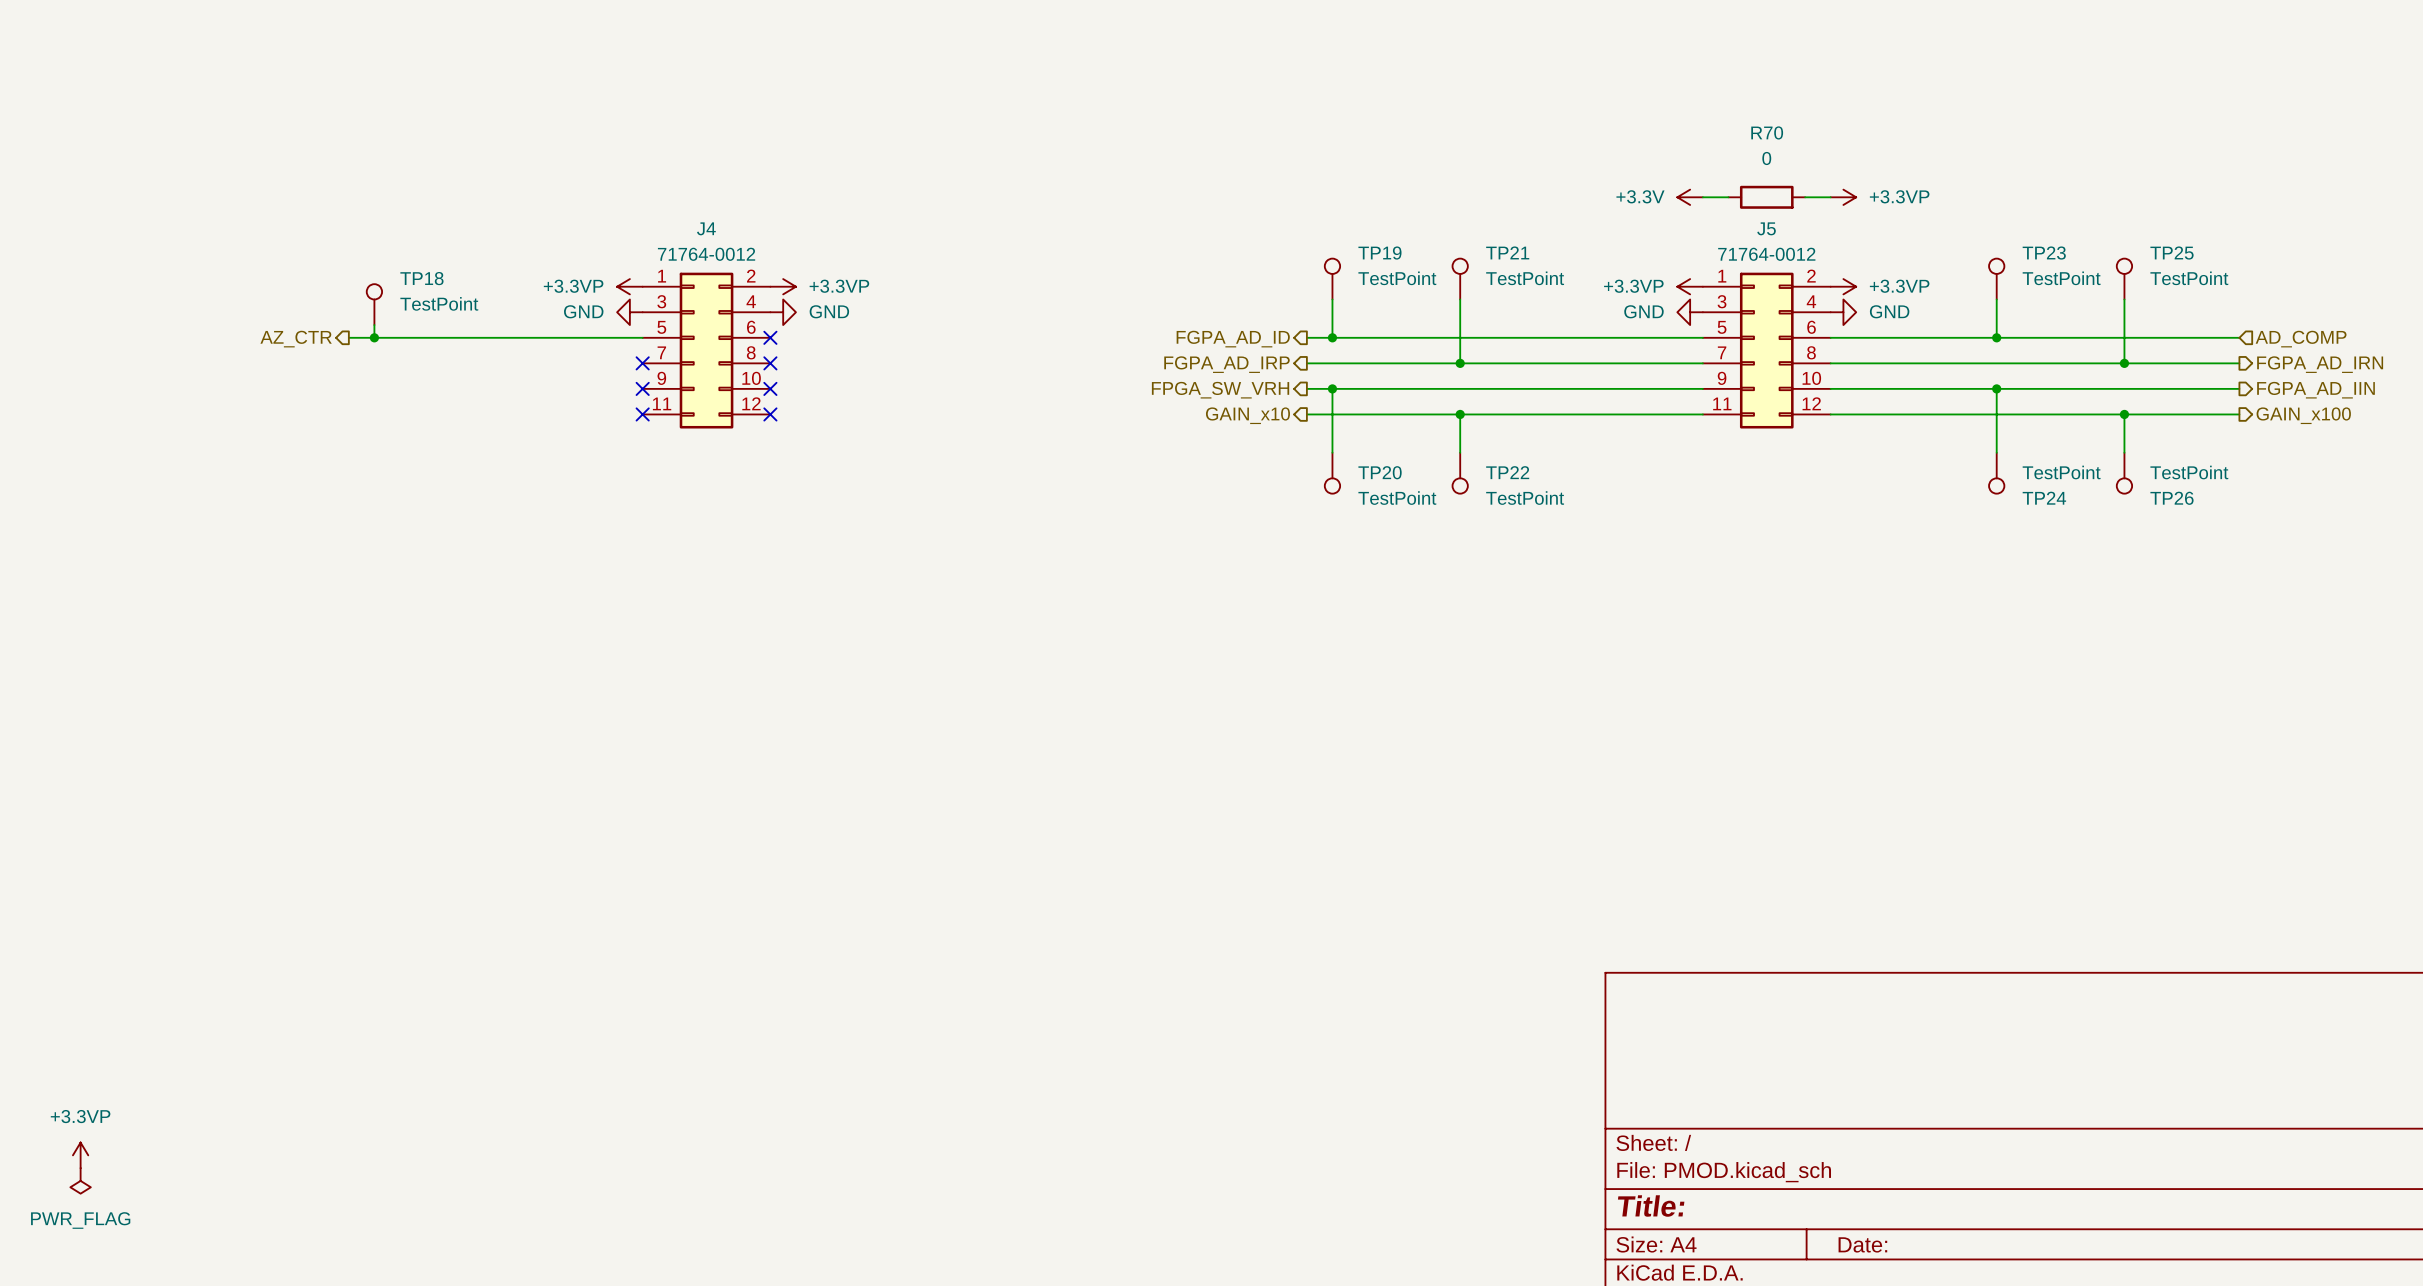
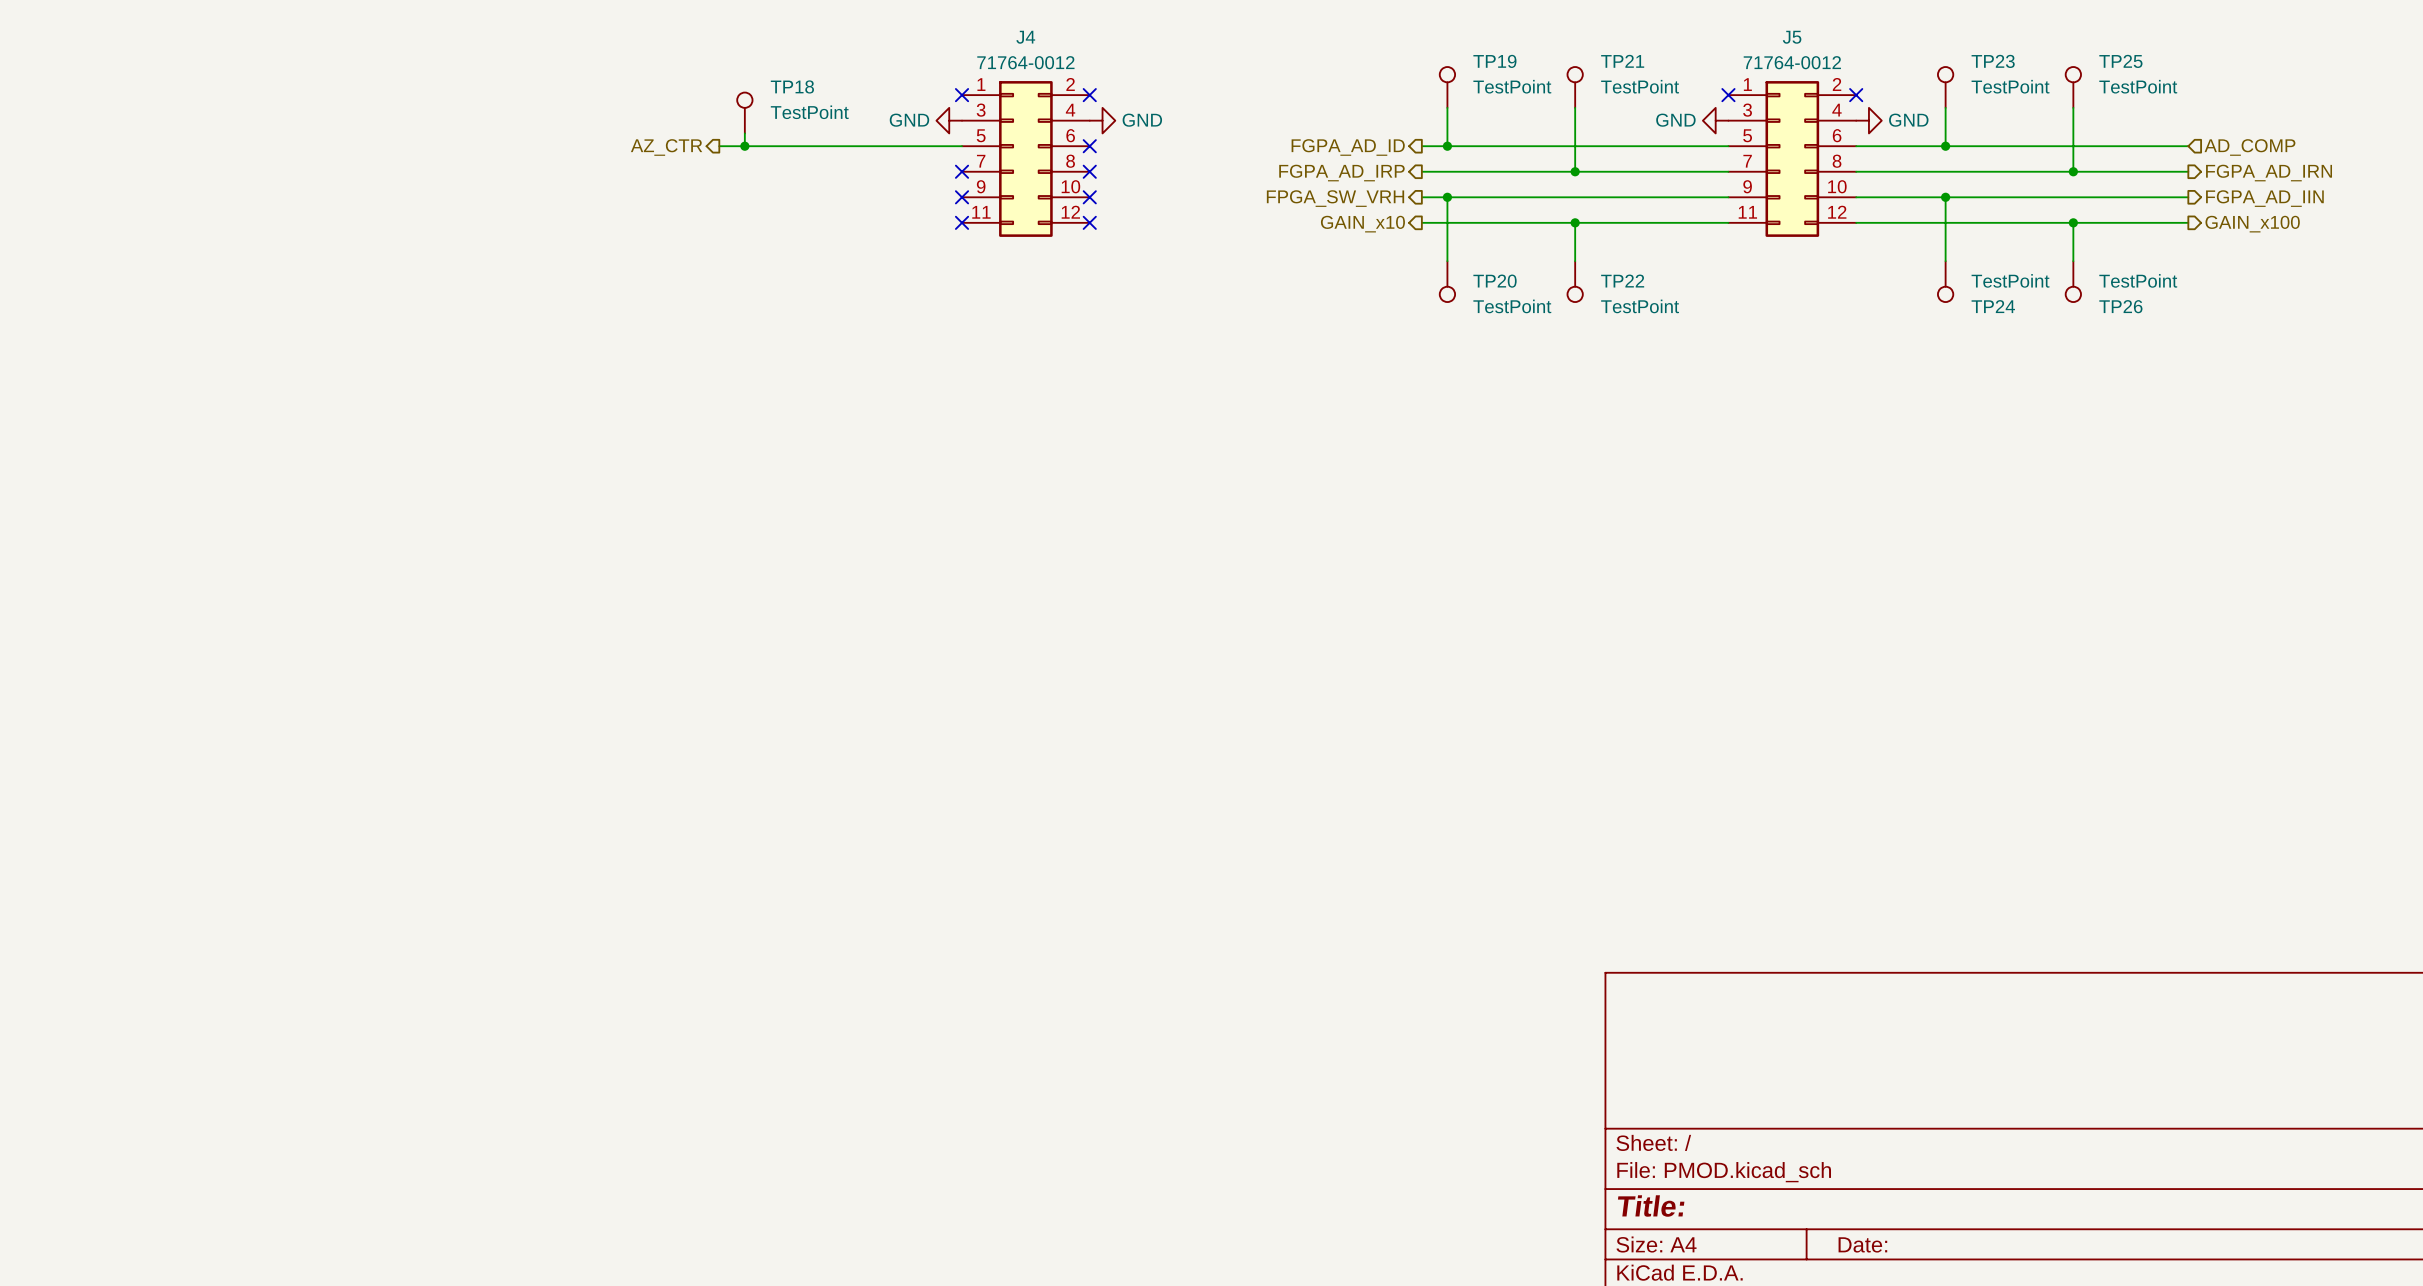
no-connect mark: none -> (962, 95)
no-connect mark: none -> (1089, 95)
no-connect mark: none -> (1728, 95)
no-connect mark: none -> (1856, 95)
power symbol: none -> GND (949, 120)
power symbol: none -> GND (1102, 120)
power symbol: none -> GND (1715, 120)
power symbol: none -> GND (1868, 120)
wire: none -> (744, 133) (744, 146)
wire: none -> (719, 146) (962, 146)
junction: none -> (744, 146)
no-connect mark: none -> (1089, 146)
wire: none -> (1421, 146) (1728, 146)
junction: none -> (1447, 146)
wire: none -> (1856, 146) (2188, 146)
junction: none -> (1945, 146)
hierarchical label: none -> AZ_CTR (666, 147)
no-connect mark: none -> (962, 171)
no-connect mark: none -> (1089, 171)
wire: none -> (1421, 171) (1728, 171)
junction: none -> (1575, 171)
wire: none -> (1856, 171) (2188, 171)
junction: none -> (2073, 171)
no-connect mark: none -> (962, 197)
no-connect mark: none -> (1089, 197)
wire: none -> (1421, 197) (1702, 197)
junction: none -> (1447, 197)
power symbol: +3.3V (1690, 197) -> none
R70: 0 (1766, 197) -> none
power symbol: +3.3VP (1843, 197) -> none
wire: none -> (1856, 197) (2188, 197)
junction: none -> (1945, 197)
no-connect mark: none -> (962, 222)
no-connect mark: none -> (1089, 222)
wire: none -> (1421, 222) (1728, 222)
junction: none -> (1575, 222)
wire: none -> (1856, 222) (2188, 222)
junction: none -> (2073, 222)
TP19 position: (1332, 279) -> (1447, 87)
TP21 position: (1460, 279) -> (1575, 87)
TP23 position: (1996, 279) -> (1945, 87)
TP25 position: (2124, 279) -> (2073, 87)
power symbol: +3.3VP (629, 286) -> none
power symbol: +3.3VP (783, 286) -> none
power symbol: +3.3VP (1690, 286) -> none
power symbol: +3.3VP (1843, 286) -> none
wire: (1332, 299) (1332, 337) -> (1447, 107) (1447, 146)
wire: (1460, 299) (1460, 363) -> (1575, 107) (1575, 171)
wire: (1996, 299) (1996, 337) -> (1945, 107) (1945, 146)
wire: (2124, 299) (2124, 363) -> (2073, 107) (2073, 171)
TP18 position: (374, 304) -> (744, 112)
power symbol: GND (629, 312) -> none
power symbol: GND (783, 312) -> none
power symbol: GND (1690, 312) -> none
power symbol: GND (1843, 312) -> none
wire: (374, 325) (374, 337) -> none
wire: (348, 337) (642, 337) -> none
junction: (374, 337) -> none
no-connect mark: (770, 337) -> none
wire: (1306, 337) (1702, 337) -> none
junction: (1332, 337) -> none
wire: (1830, 337) (2239, 337) -> none
junction: (1996, 337) -> none
hierarchical label: AZ_CTR (296, 339) -> none
hierarchical label position: FGPA_AD_ID (1233, 339) -> FGPA_AD_ID (1348, 147)
hierarchical label position: AD_COMP (2301, 339) -> AD_COMP (2249, 147)
J4 position: (706, 350) -> (1025, 158)
J5 position: (1766, 350) -> (1792, 158)
no-connect mark: (642, 363) -> none
no-connect mark: (770, 363) -> none
wire: (1306, 363) (1702, 363) -> none
junction: (1460, 363) -> none
wire: (1830, 363) (2239, 363) -> none
junction: (2124, 363) -> none
hierarchical label position: FGPA_AD_IRP (1226, 364) -> FGPA_AD_IRP (1341, 173)
hierarchical label position: FGPA_AD_IRN (2320, 364) -> FGPA_AD_IRN (2269, 173)
no-connect mark: (642, 388) -> none
no-connect mark: (770, 388) -> none
wire: (1306, 388) (1702, 388) -> none
wire: (1332, 388) (1332, 452) -> (1447, 197) (1447, 261)
junction: (1332, 388) -> none
wire: (1830, 388) (2239, 388) -> none
wire: (1996, 388) (1996, 452) -> (1945, 197) (1945, 261)
junction: (1996, 388) -> none
hierarchical label position: FPGA_SW_VRH (1220, 390) -> FPGA_SW_VRH (1335, 198)
hierarchical label position: FGPA_AD_IIN (2316, 390) -> FGPA_AD_IIN (2264, 198)
no-connect mark: (642, 414) -> none
no-connect mark: (770, 414) -> none
wire: (1306, 414) (1702, 414) -> none
wire: (1460, 414) (1460, 452) -> (1575, 222) (1575, 261)
junction: (1460, 414) -> none
wire: (1830, 414) (2239, 414) -> none
wire: (2124, 414) (2124, 452) -> (2073, 222) (2073, 261)
junction: (2124, 414) -> none
hierarchical label position: GAIN_x10 (1247, 415) -> GAIN_x10 (1362, 224)
hierarchical label position: GAIN_x100 (2303, 415) -> GAIN_x100 (2252, 224)
TP20 position: (1332, 473) -> (1447, 281)
TP22 position: (1460, 473) -> (1575, 281)
TP24 position: (1996, 473) -> (1945, 281)
TP26 position: (2124, 473) -> (2073, 281)
power symbol: +3.3VP (80, 1155) -> none
power symbol: PWR_FLAG (80, 1180) -> none

